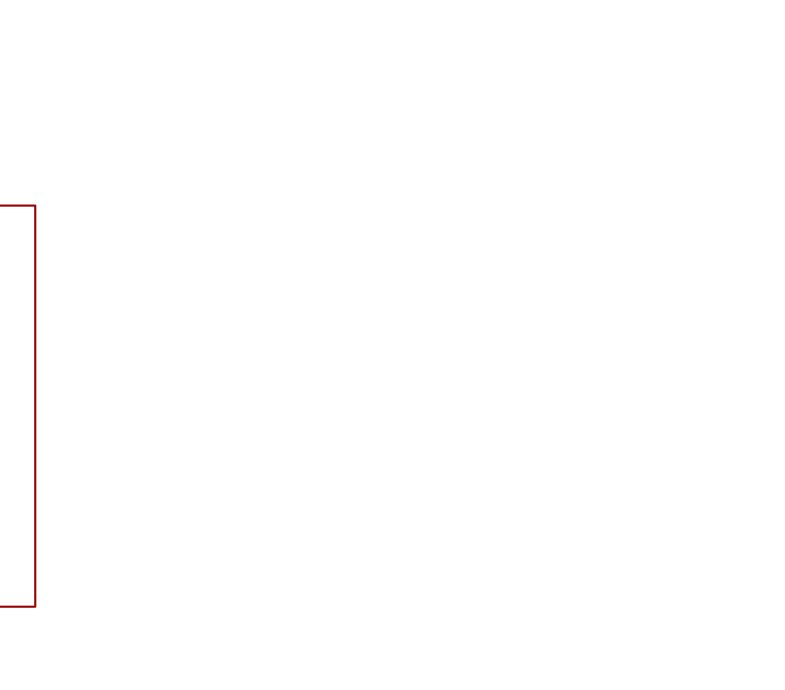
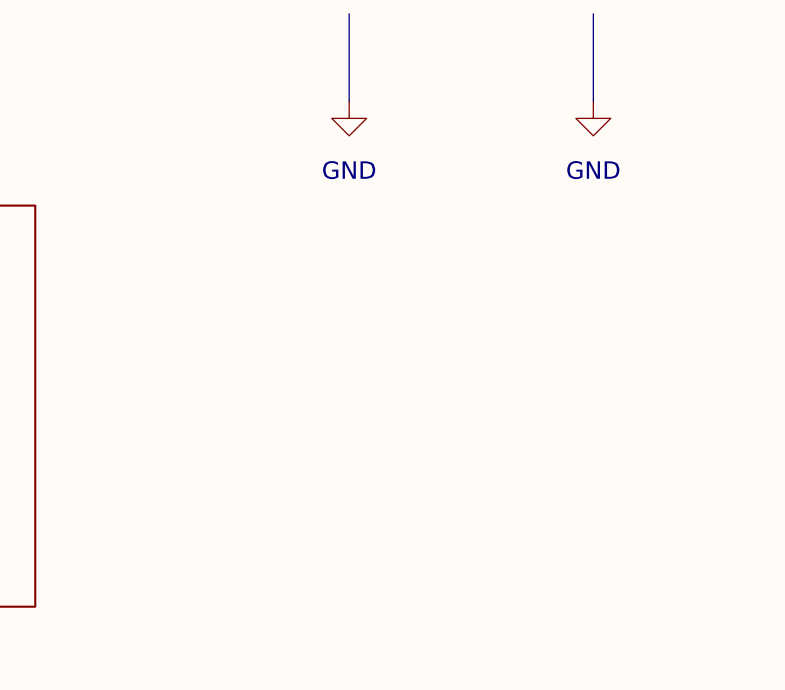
wire: none -> (349, 13) (349, 100)
wire: none -> (593, 13) (593, 100)
power symbol: none -> GND (349, 118)
power symbol: none -> GND (593, 118)

